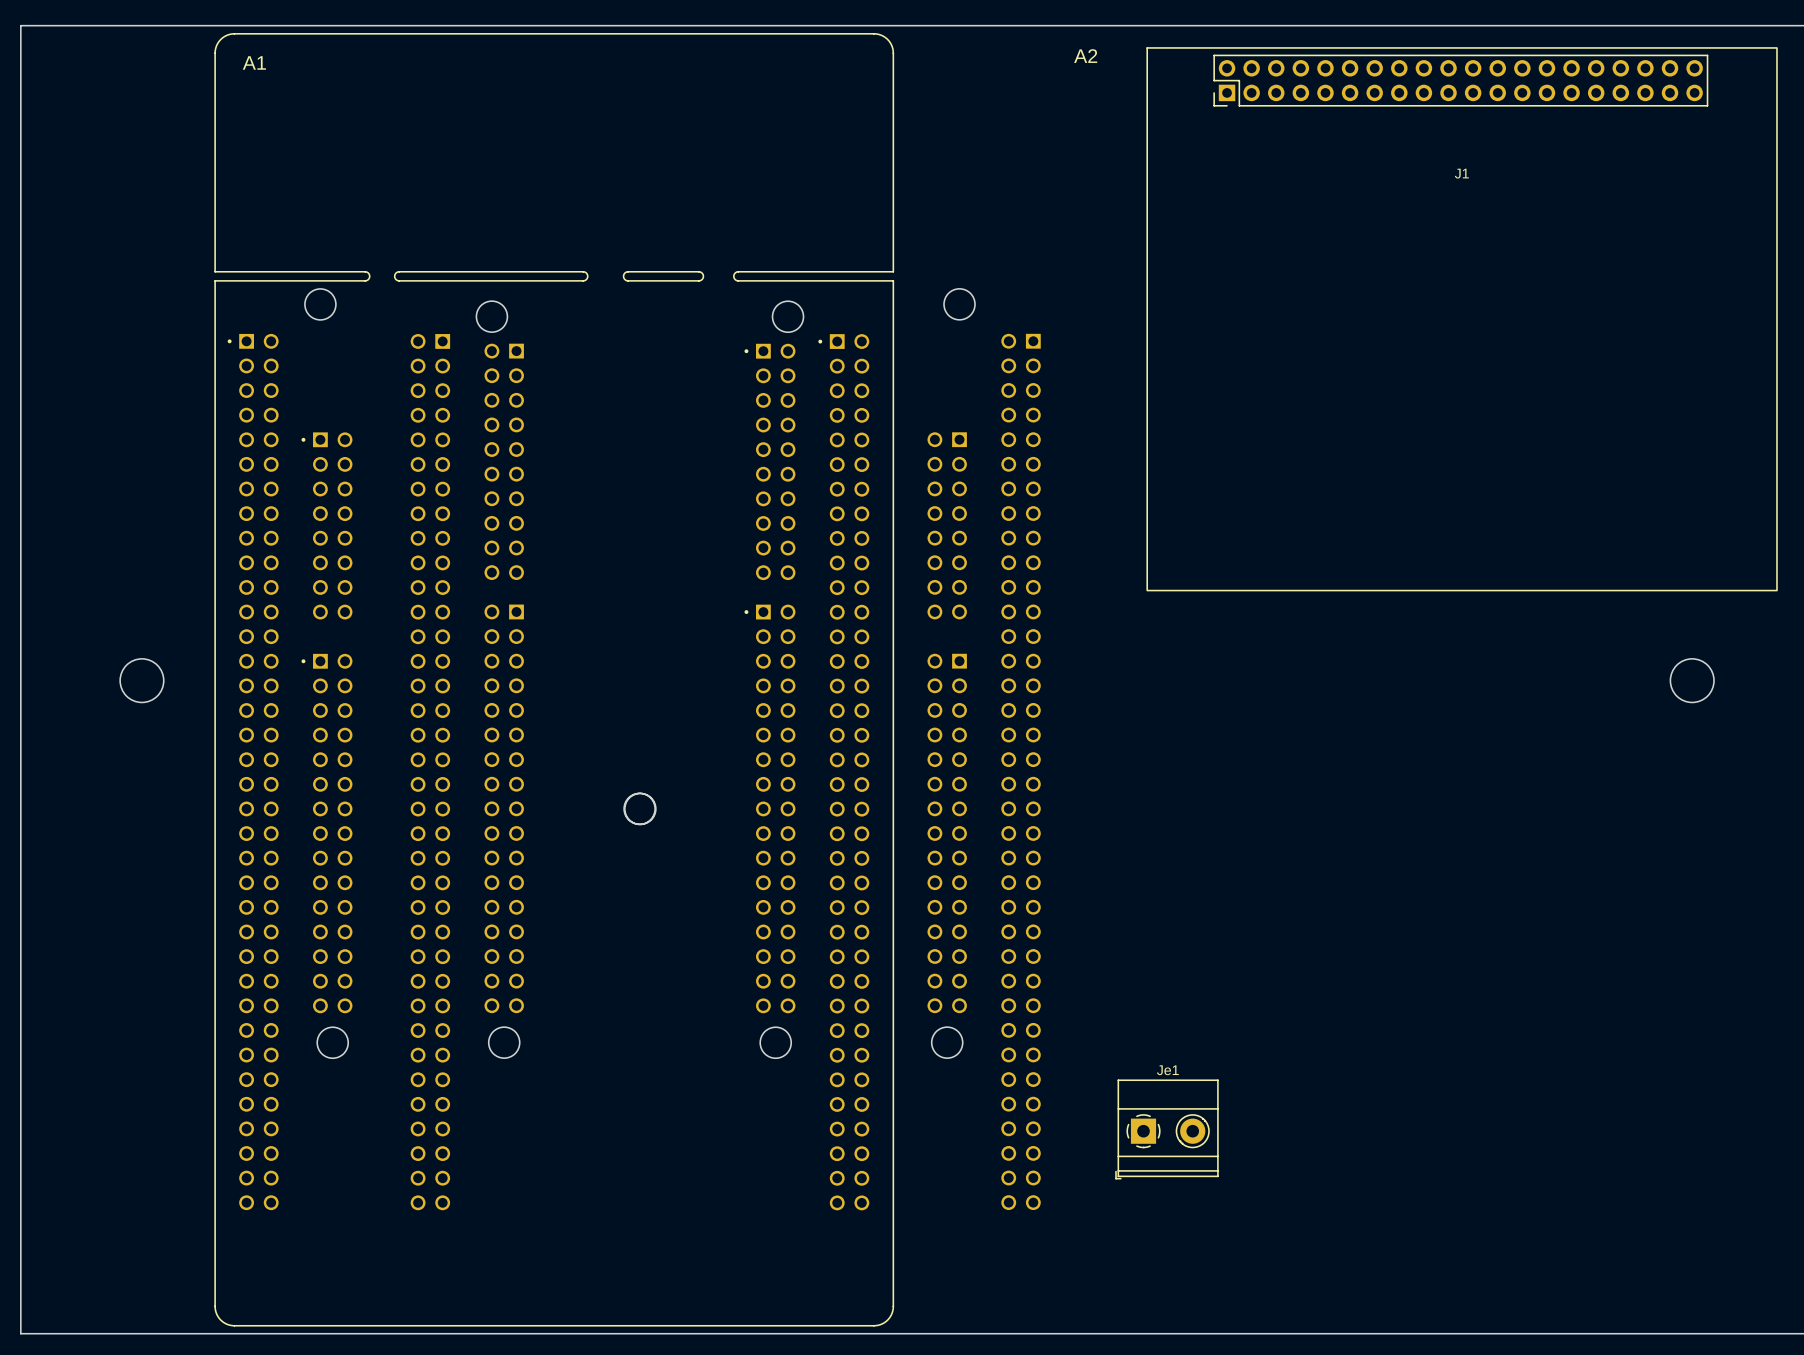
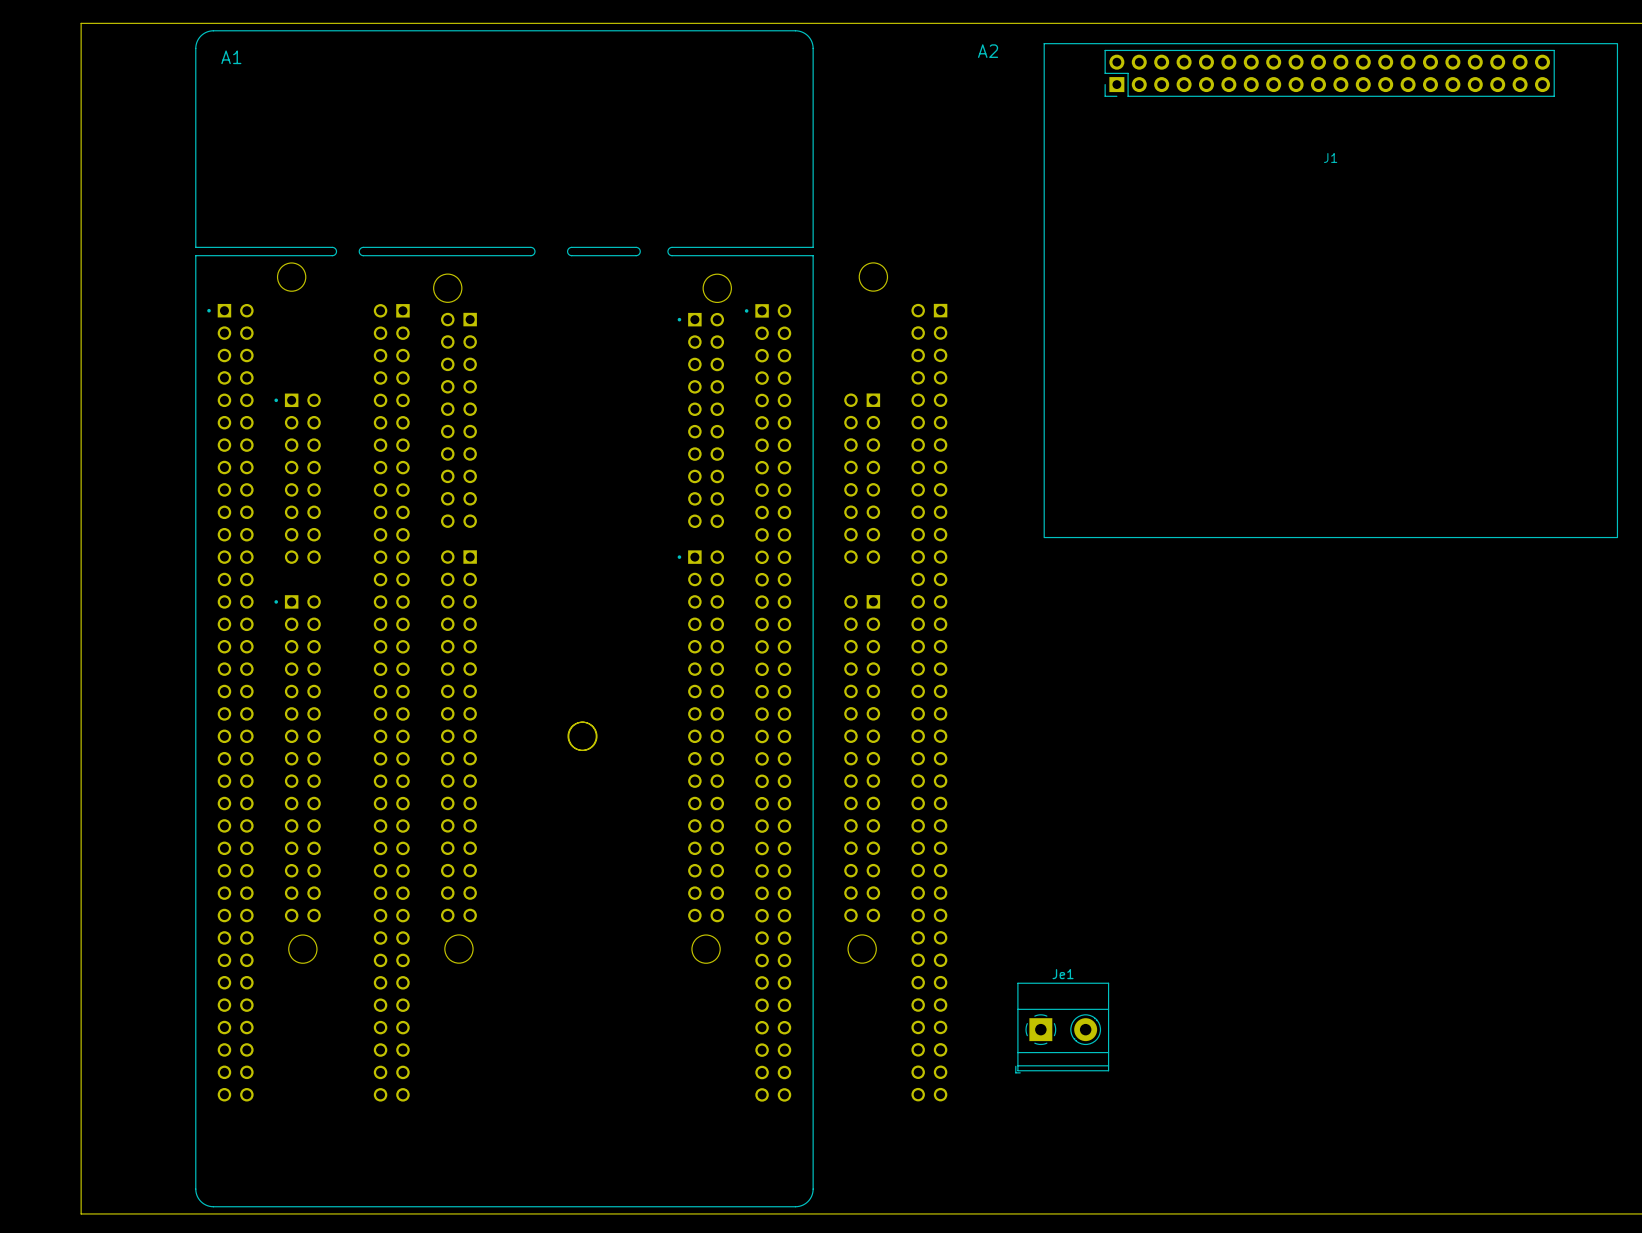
board edge: (89, 25) (20, 25) (20, 1333) (89, 1333) -> (81, 23) (81, 1213)
round board edge: [119, 658, 165, 703] -> none
round board edge: [1669, 658, 1715, 703] -> none

